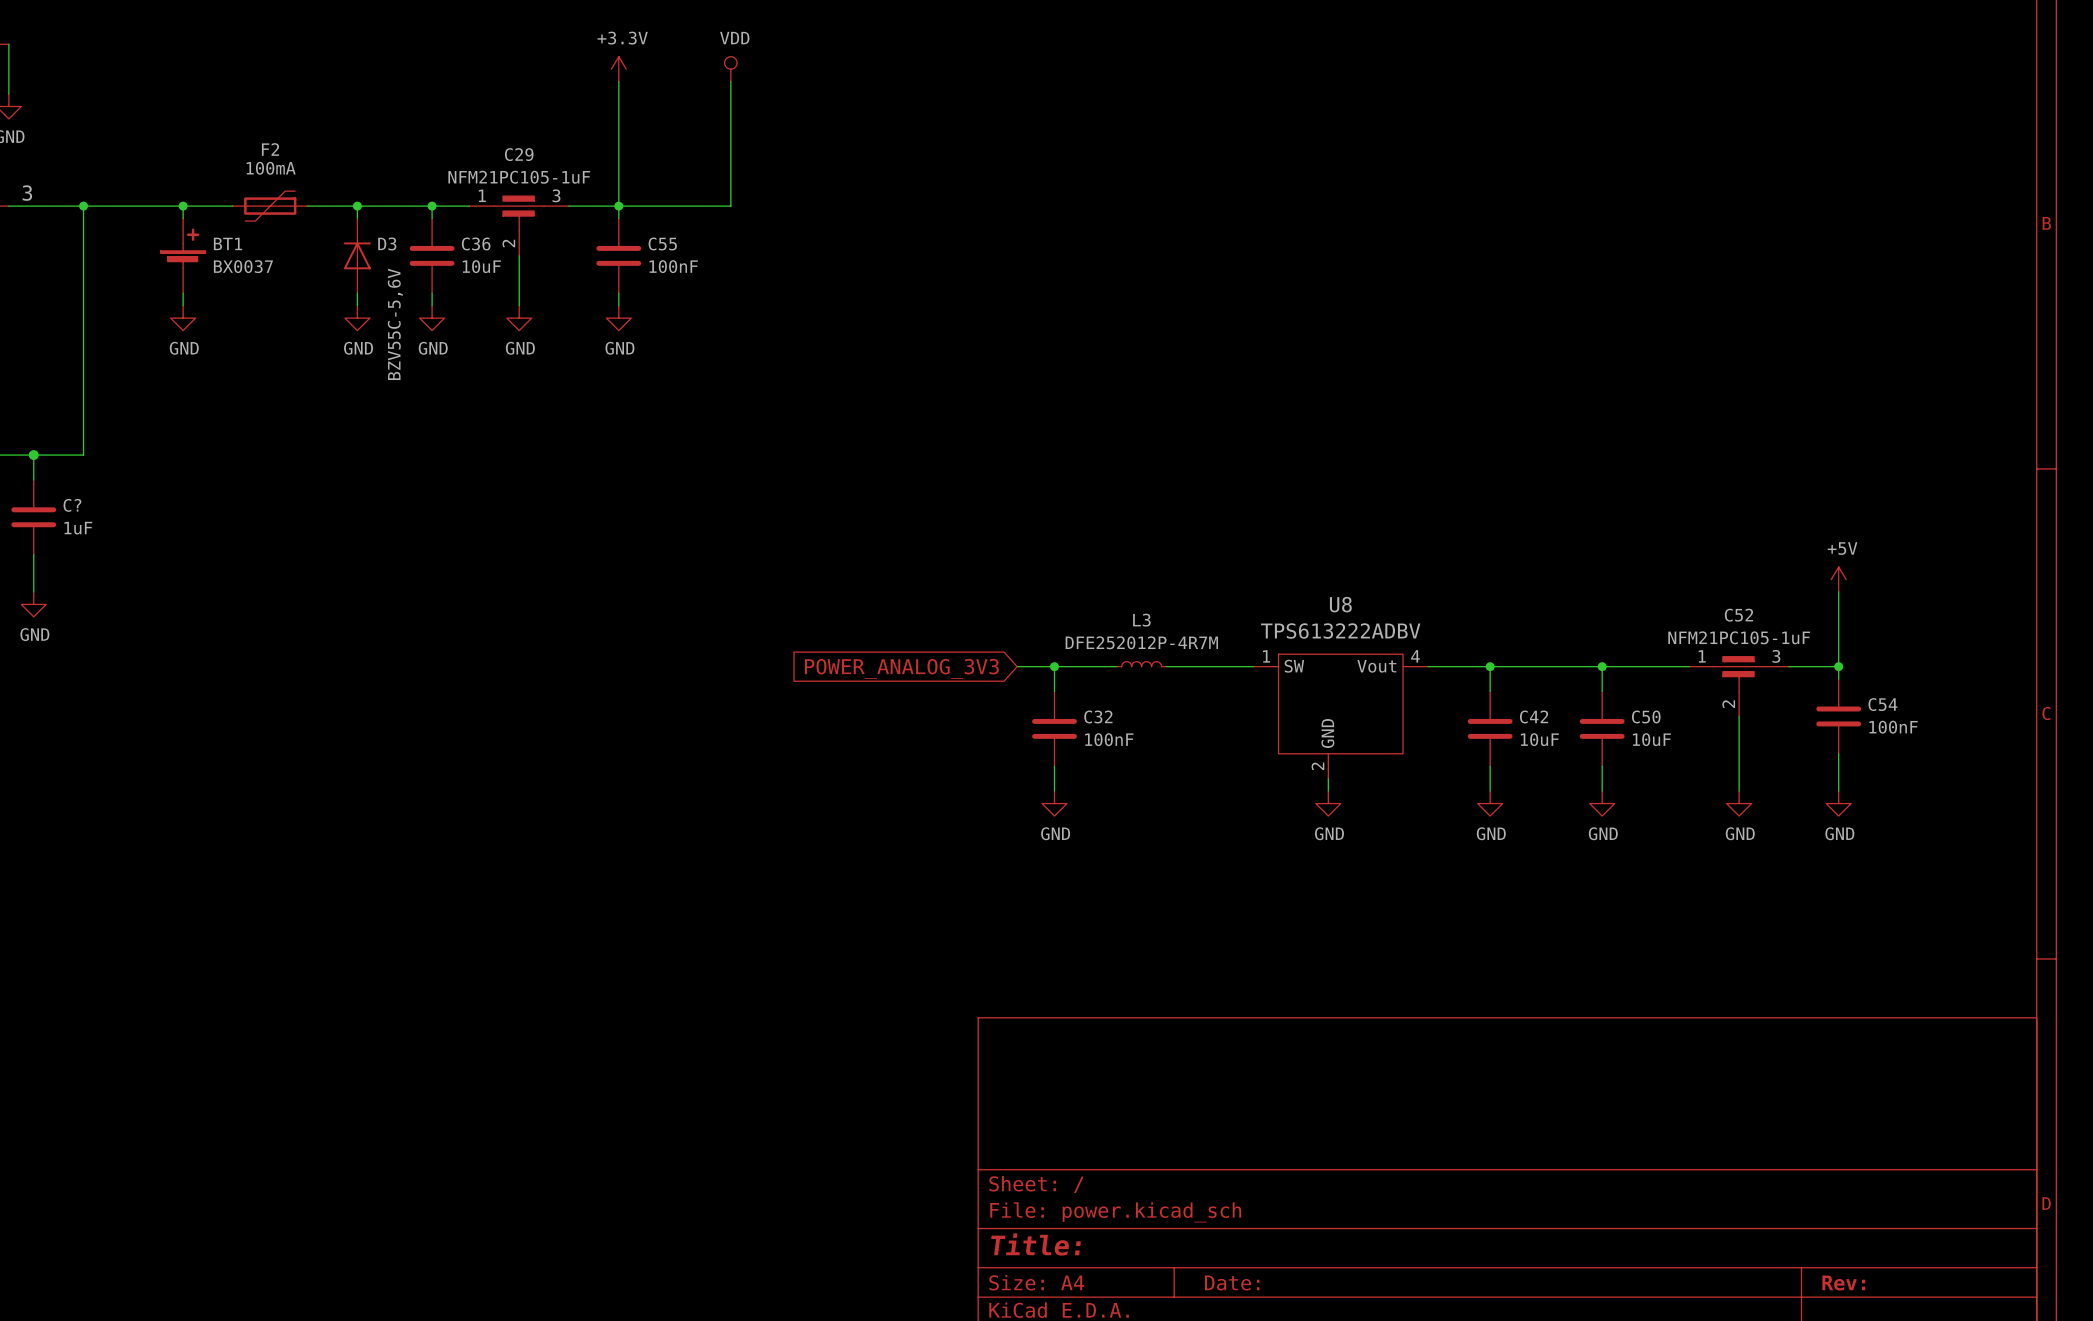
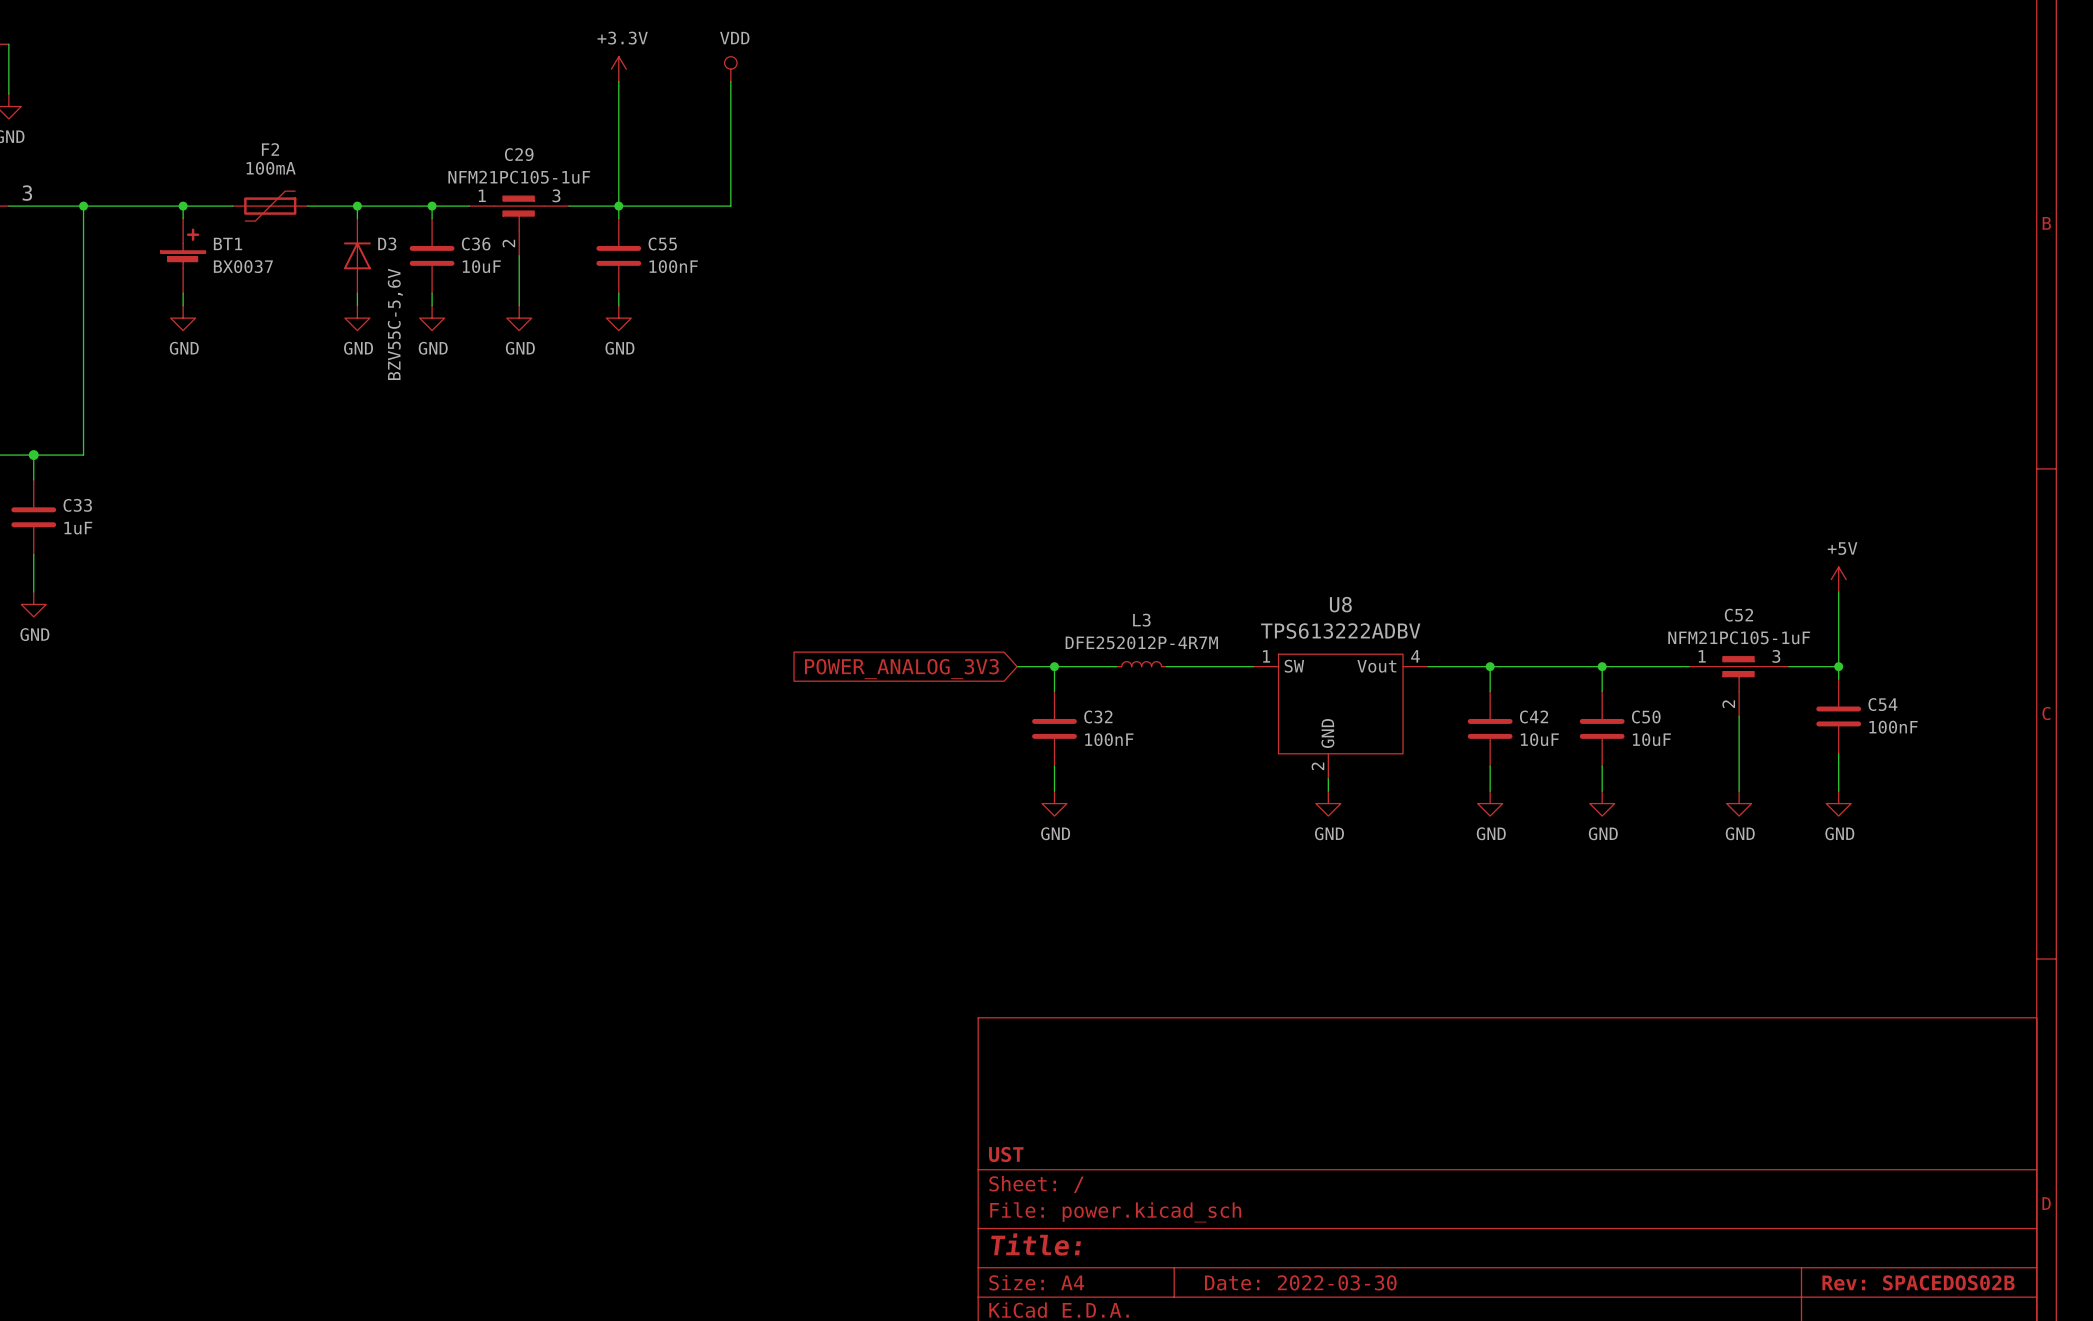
C? name: C? (72, 505) -> C33 (77, 505)
title block: none -> UST (1006, 1154)
title block: Date: (1232, 1283) -> Date: 2022-03-30 (1300, 1282)
title block: Rev: (1843, 1283) -> Rev: SPACEDOS02B (1918, 1282)

